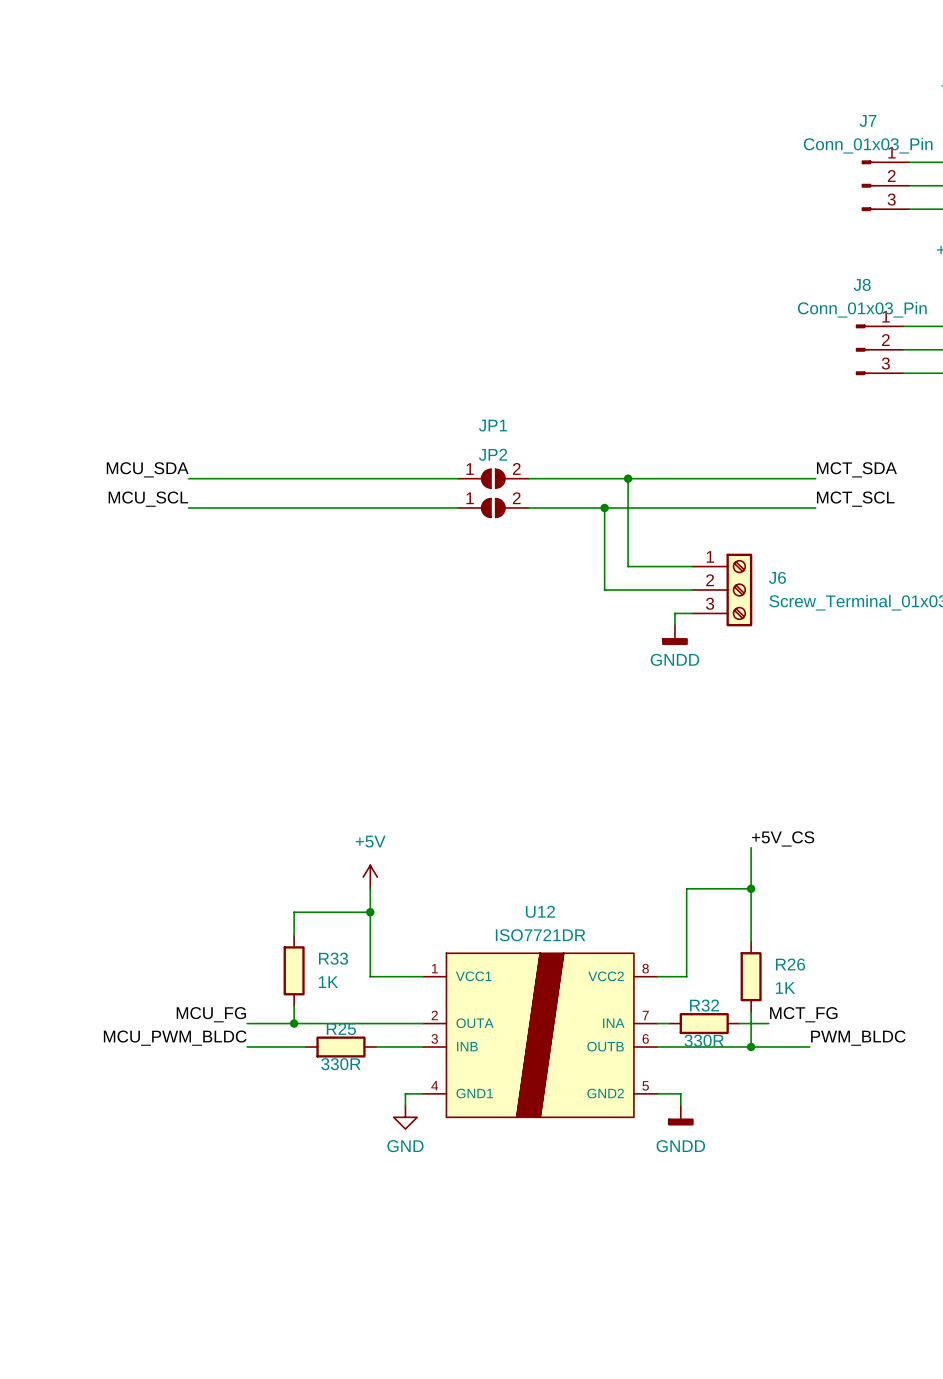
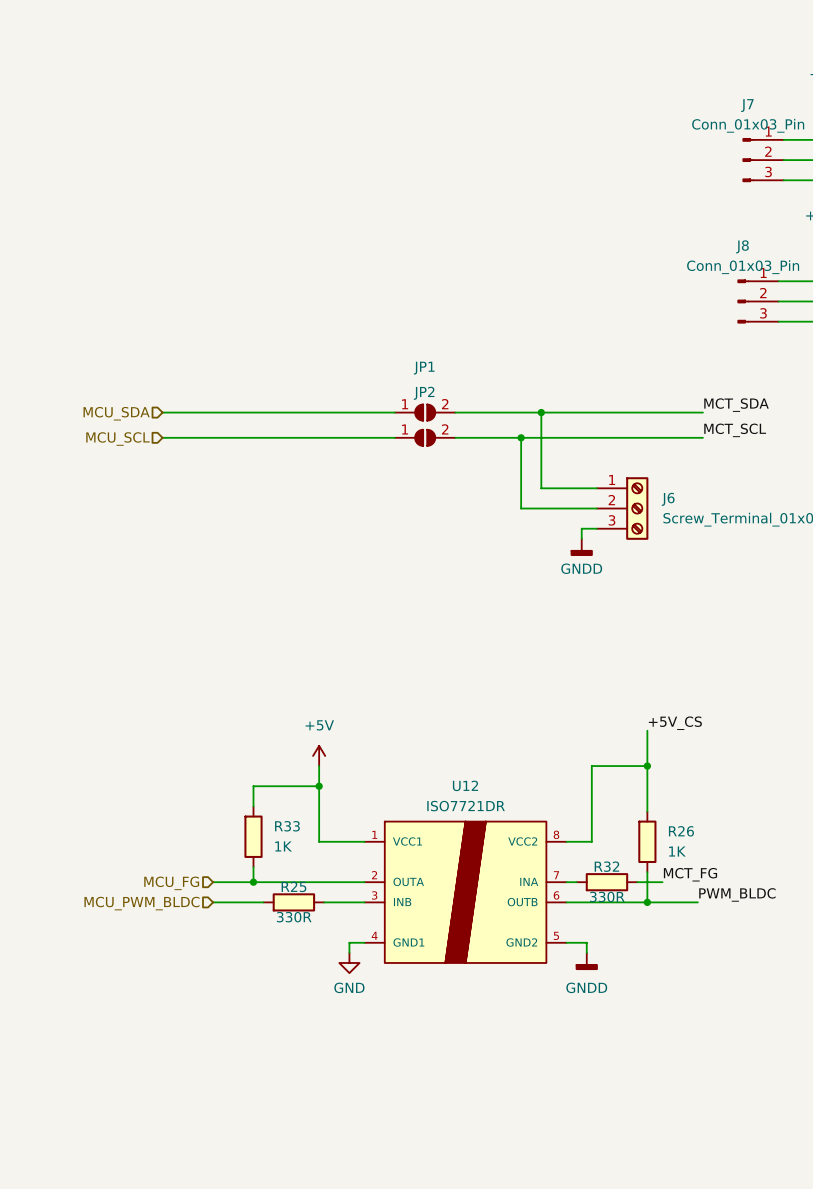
label: MCU_SDA (147, 469) -> none
hierarchical label: none -> MCU_SDA (116, 413)
label: MCU_SCL (148, 499) -> none
hierarchical label: none -> MCU_SCL (117, 438)
label: MCU_FG (211, 1014) -> none
hierarchical label: none -> MCU_FG (171, 883)
label: MCU_PWM_BLDC (175, 1038) -> none
hierarchical label: none -> MCU_PWM_BLDC (141, 903)

